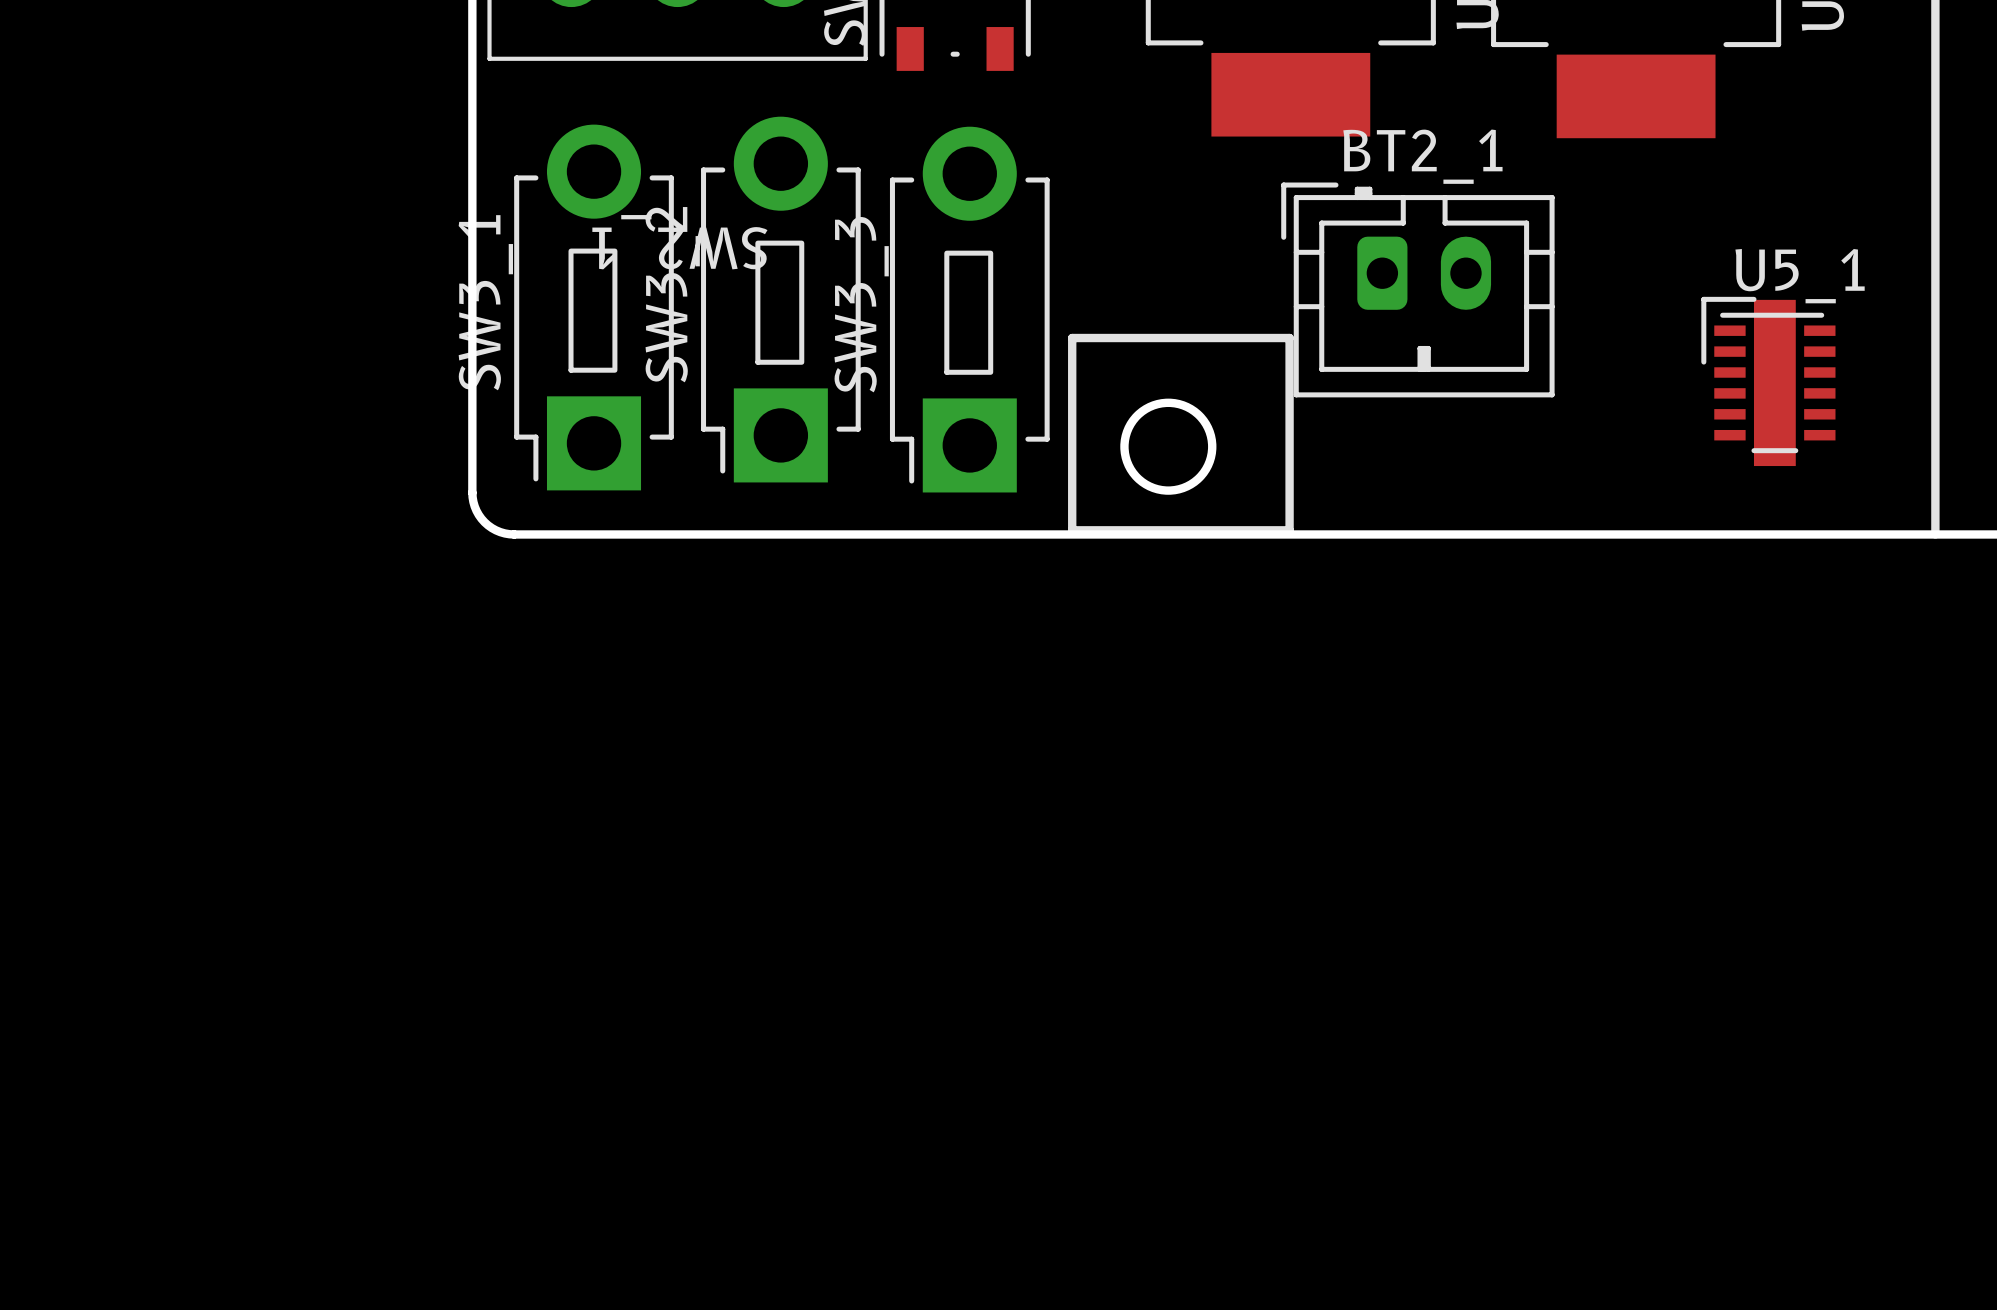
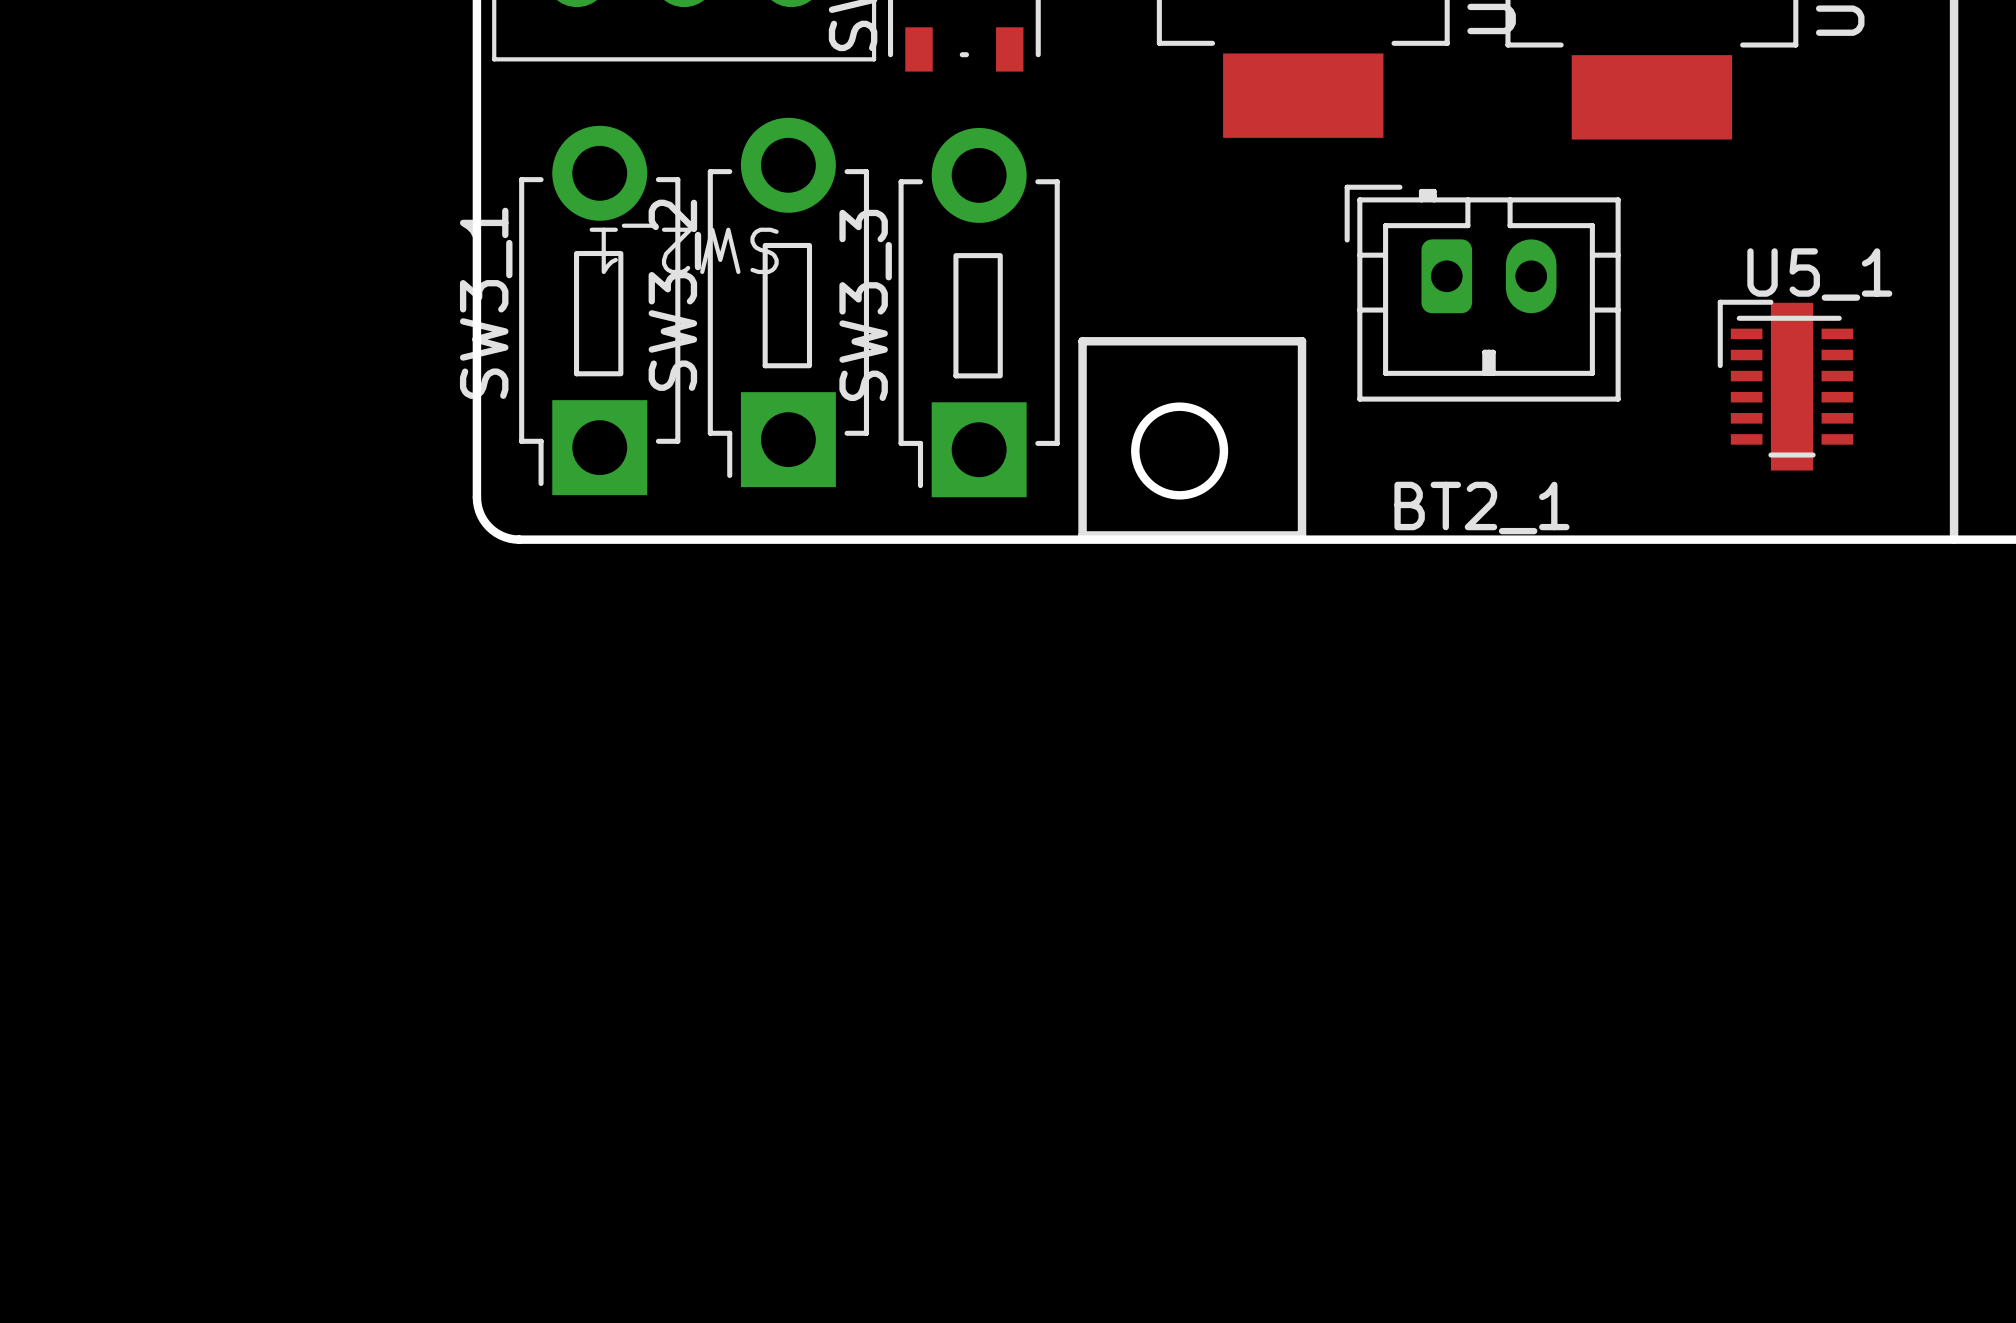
BT2_1 name position: BT2_1 (1422, 156) -> BT2_1 (1481, 507)
BT2_1 position: (1417, 289) -> (1482, 293)

